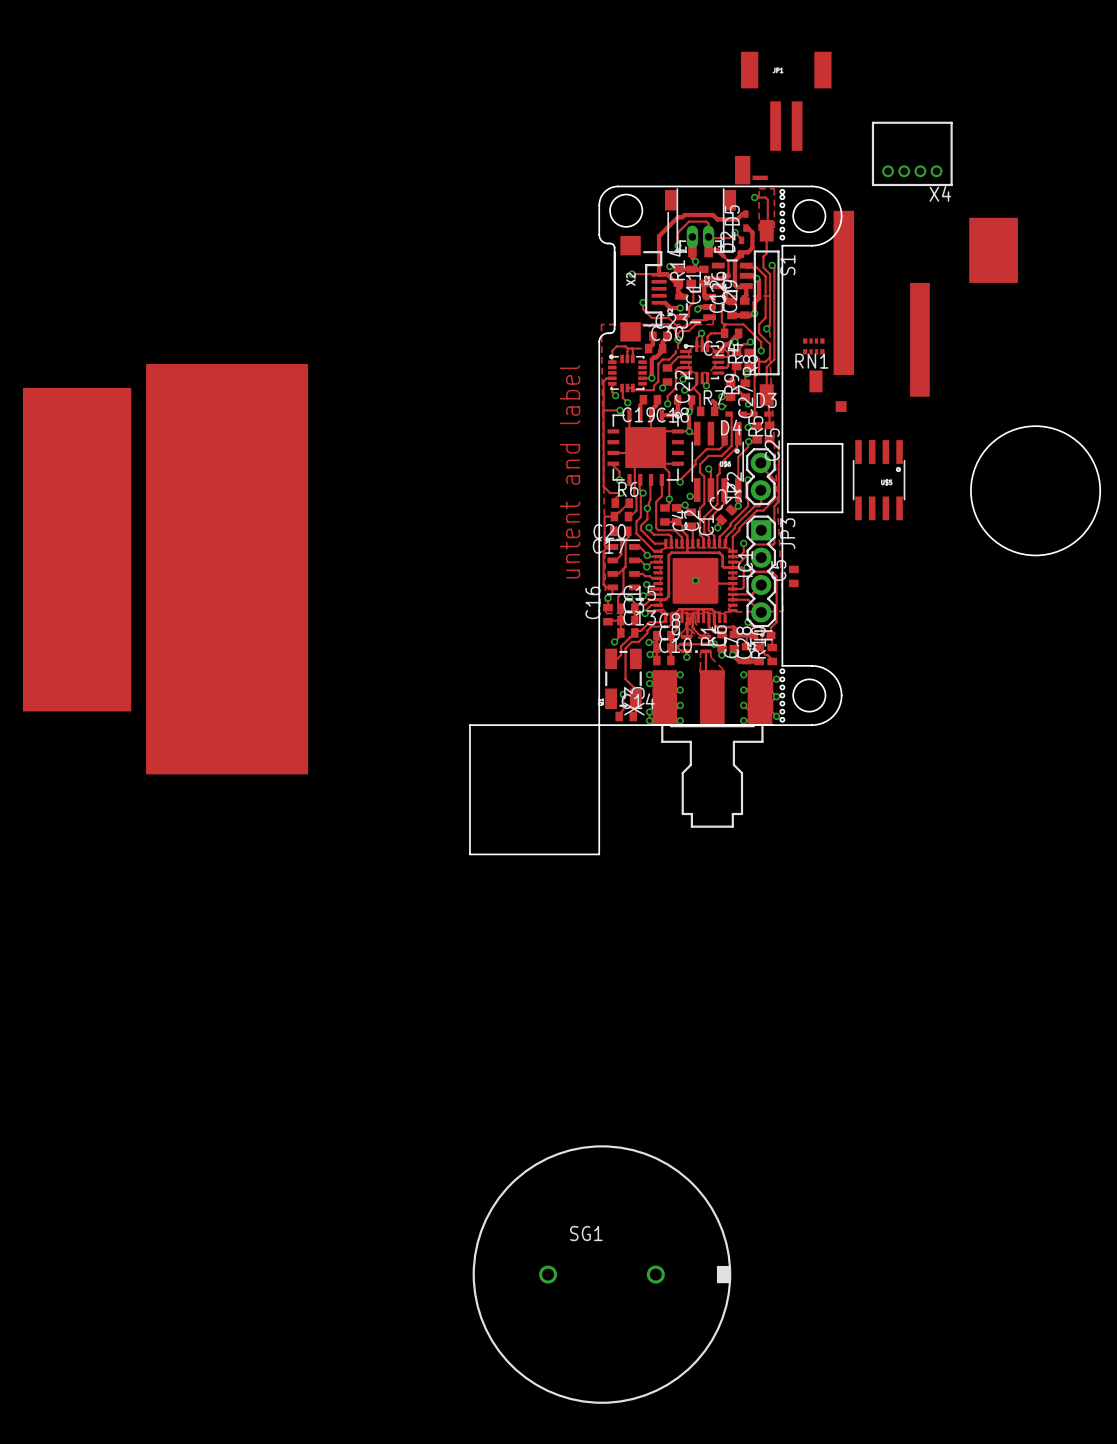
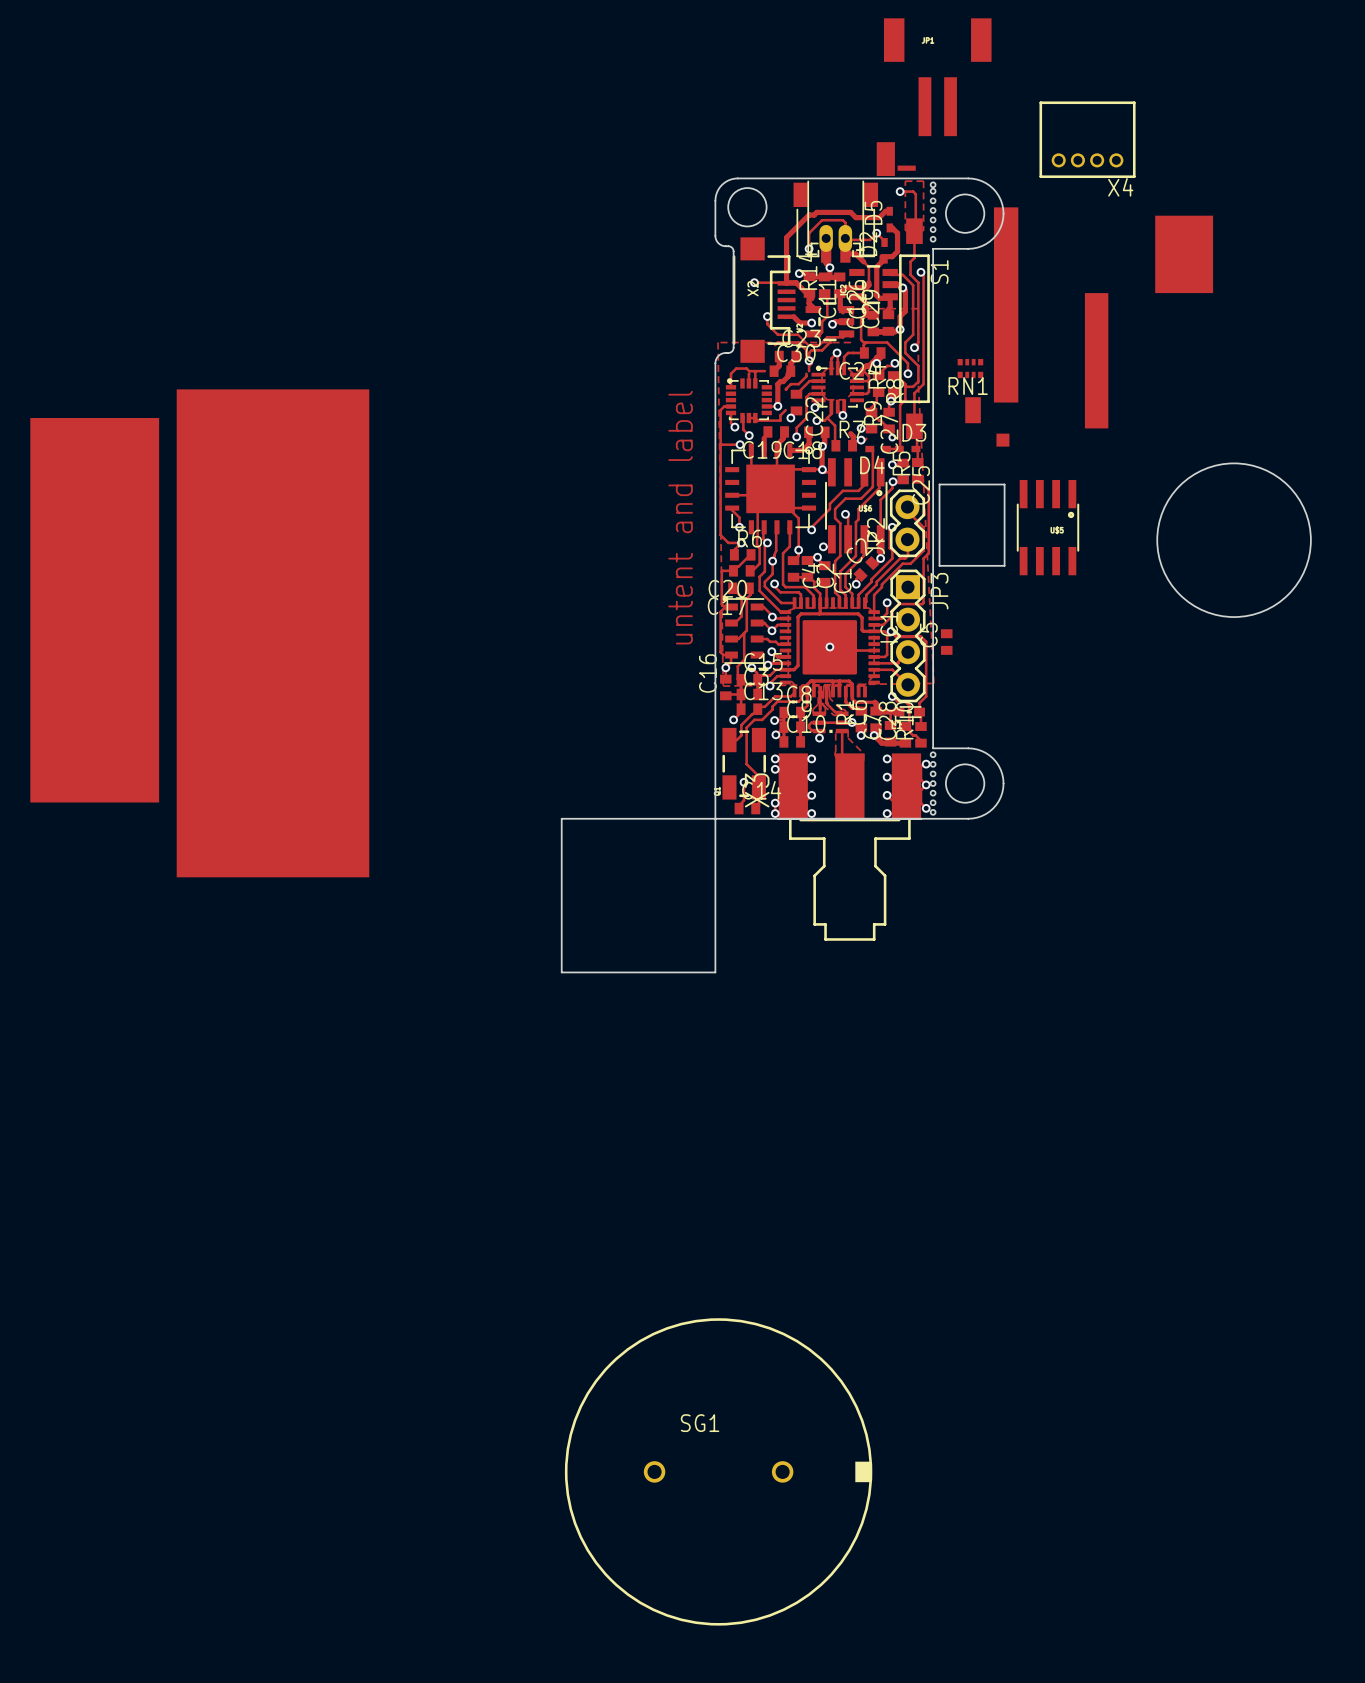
track: (658, 363) (658, 381) -> none

